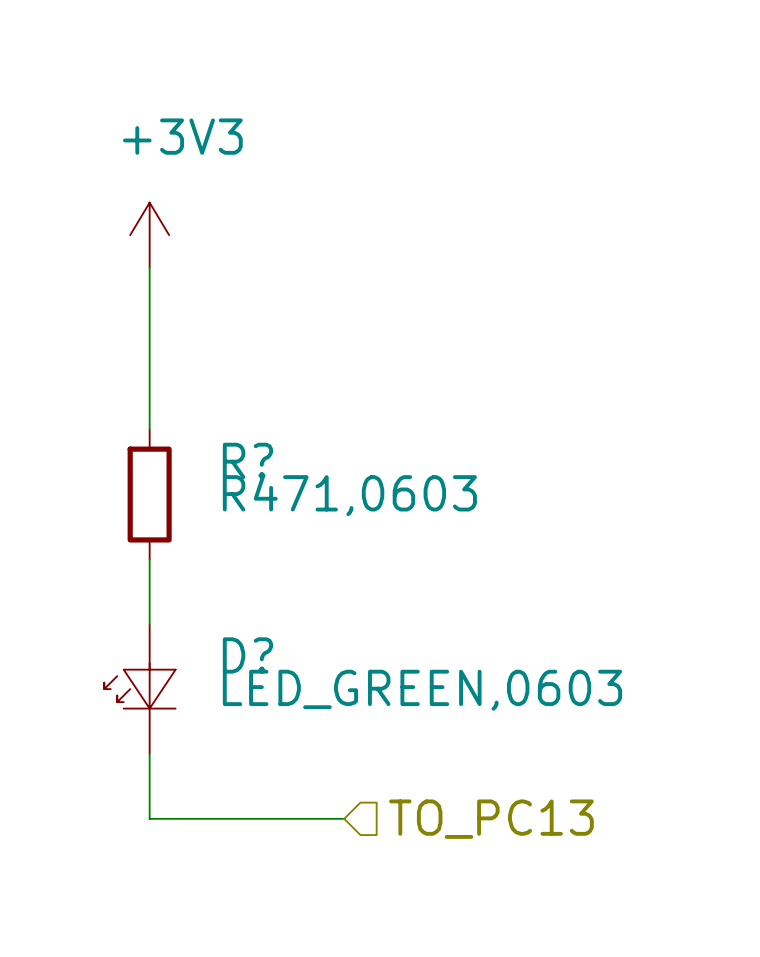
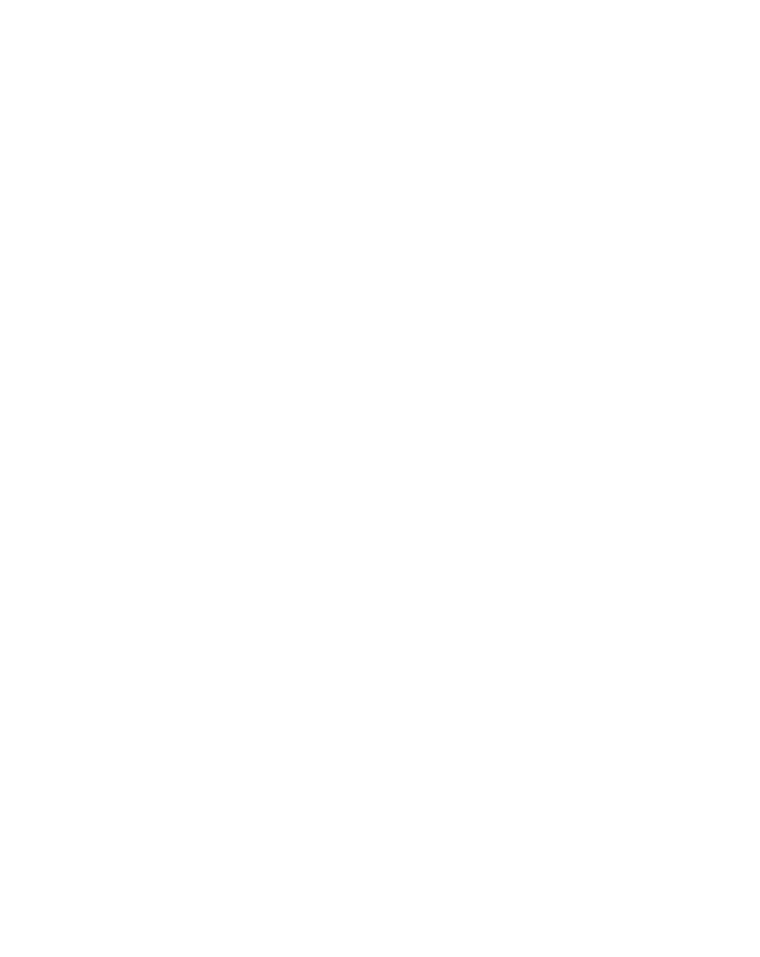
power symbol: +3V3 (149, 235) -> none
wire: (149, 267) (149, 429) -> none
R?: R471,0603 (149, 494) -> none
wire: (149, 559) (149, 624) -> none
D?: LED_GREEN,0603 (139, 689) -> none
wire: (149, 753) (149, 818) (344, 818) -> none
hierarchical label: TO_PC13 (491, 819) -> none

